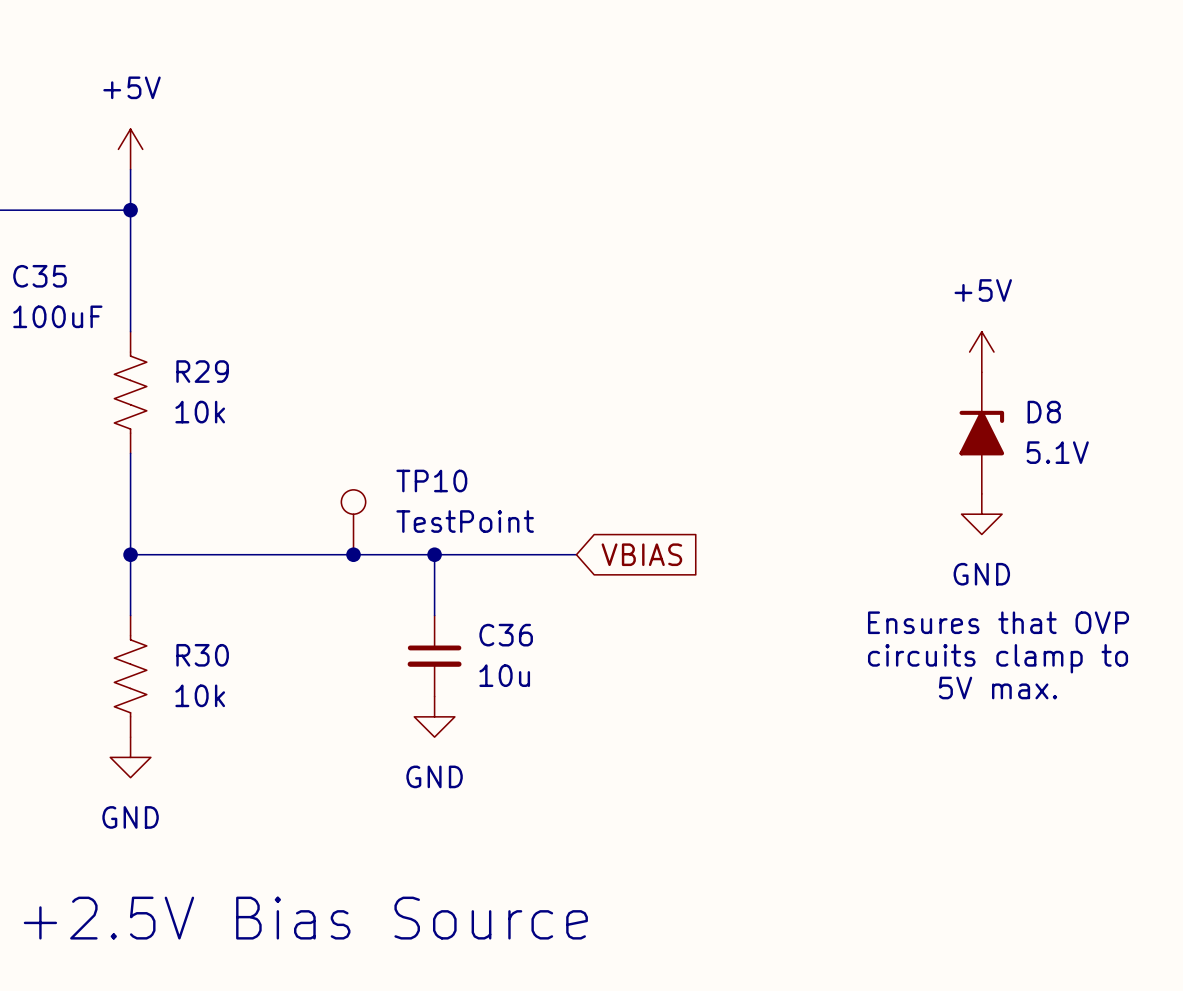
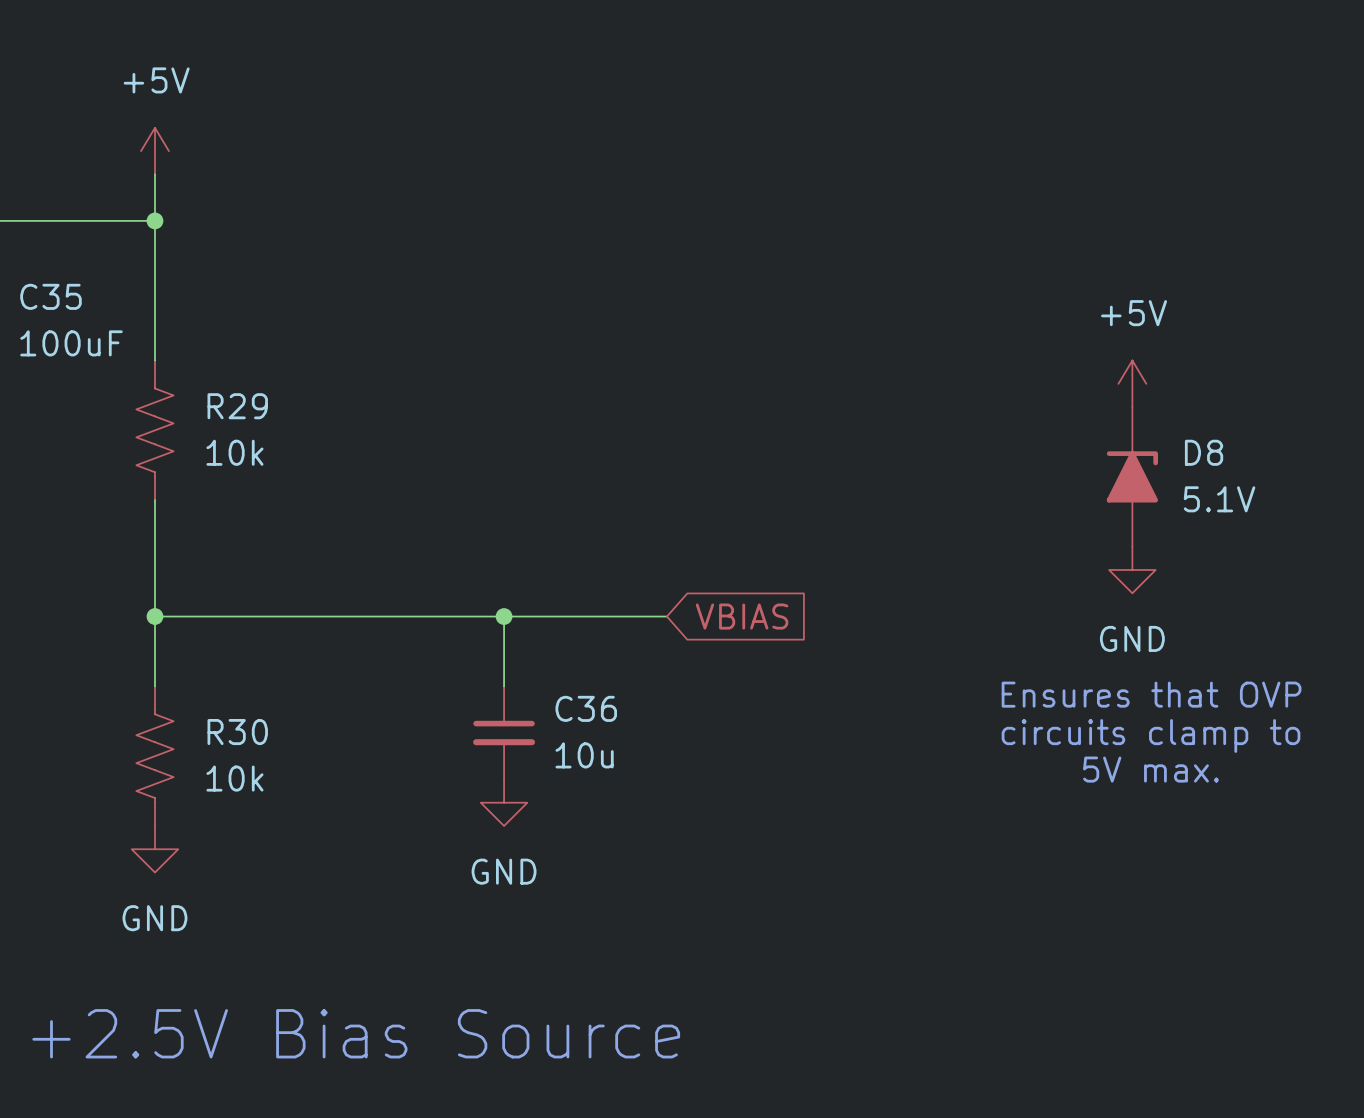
TP10: TestPoint (353, 522) -> none
junction: (353, 554) -> none

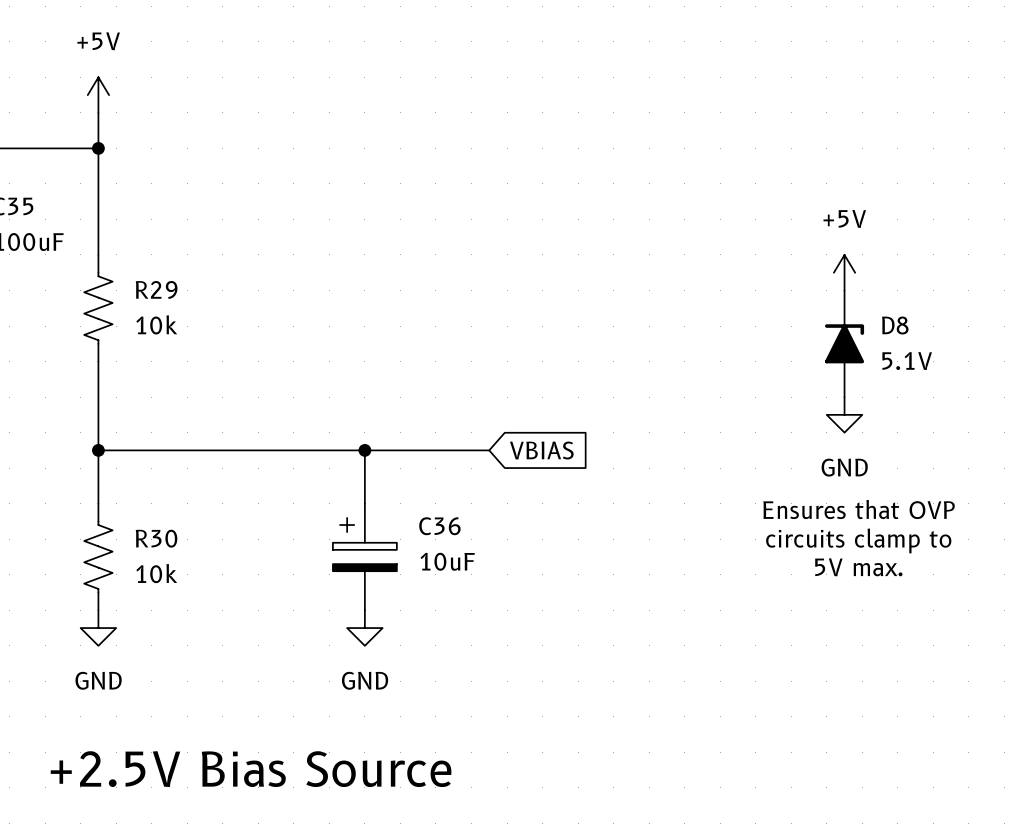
C36 symbol: [473, 686, 536, 780] -> [332, 503, 397, 611]
C36 value: 10u (584, 755) -> 10uF (447, 561)
power symbol position: GND (504, 802) -> GND (364, 628)

